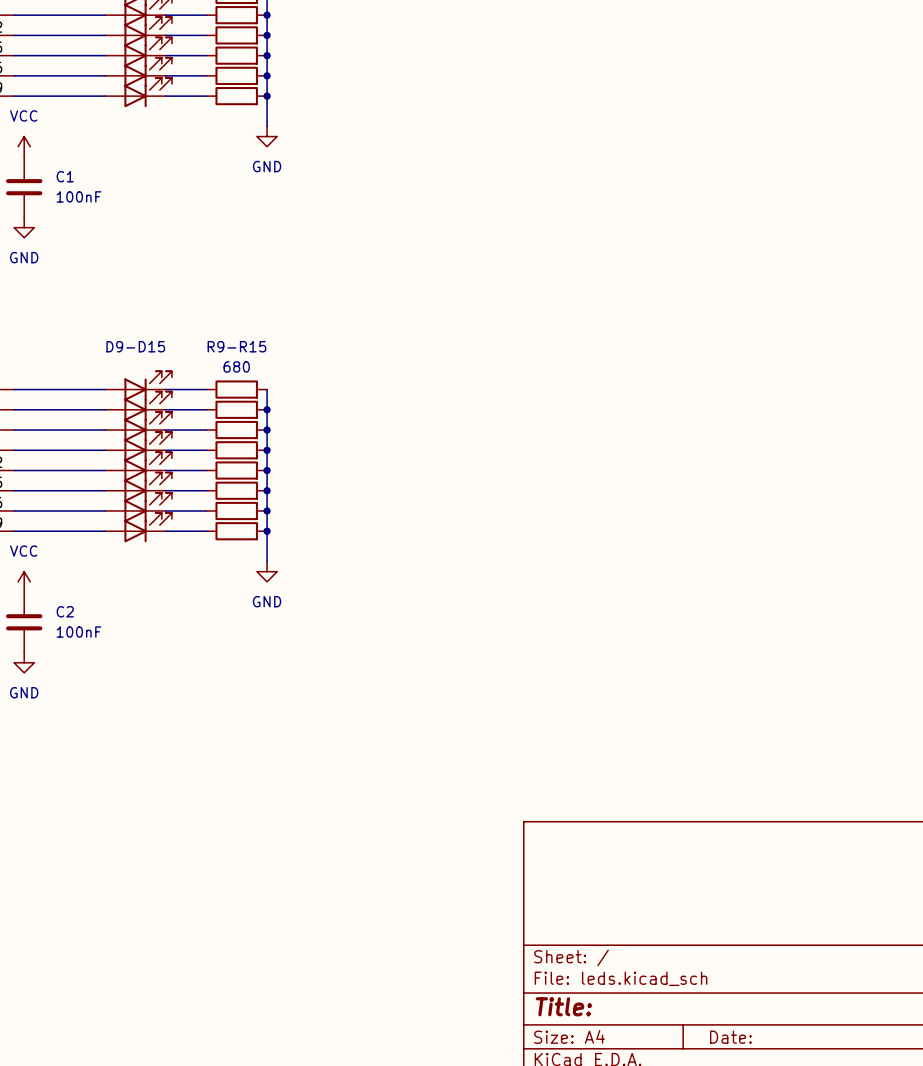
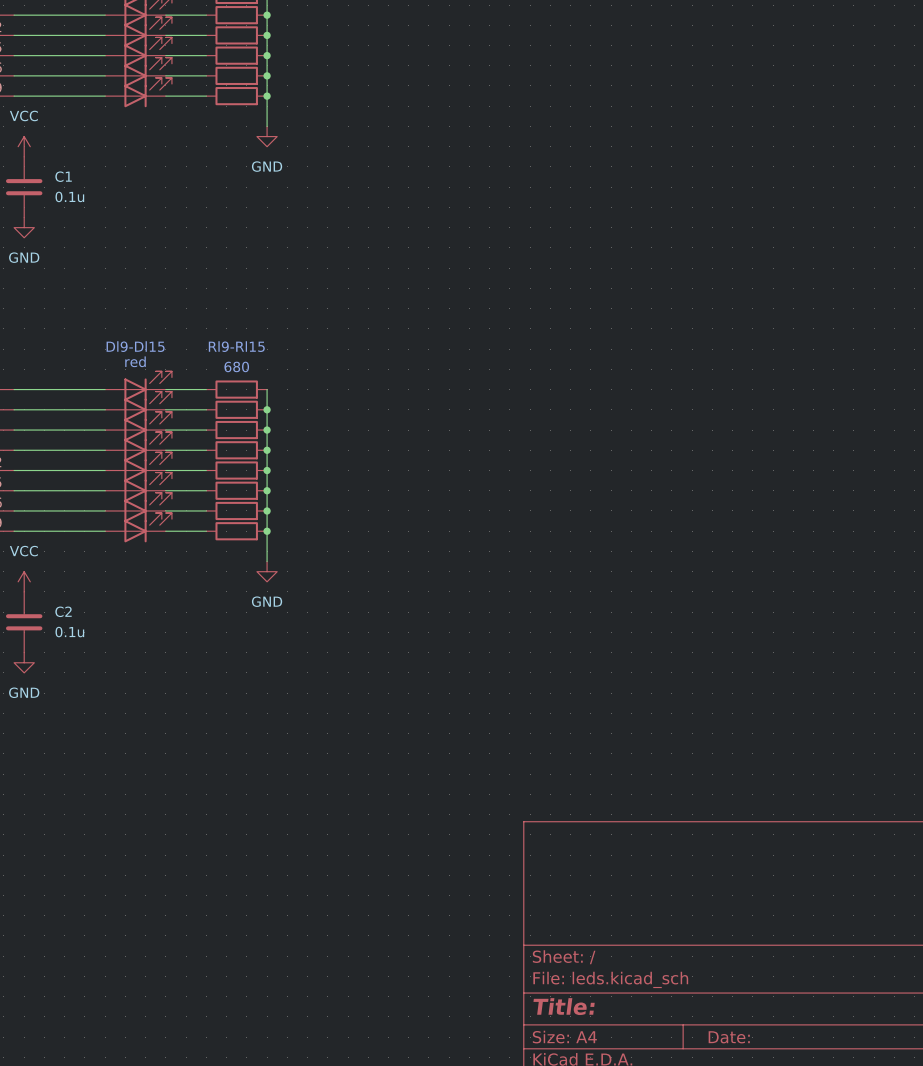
C1 value: 100nF (78, 196) -> 0.1u (69, 196)
text: D9-D15 (135, 346) -> Dl9-Dl15 (135, 346)
text: R9-R15 (236, 346) -> Rl9-Rl15 (236, 346)
text: none -> red (135, 361)
C2 value: 100nF (78, 632) -> 0.1u (69, 632)

